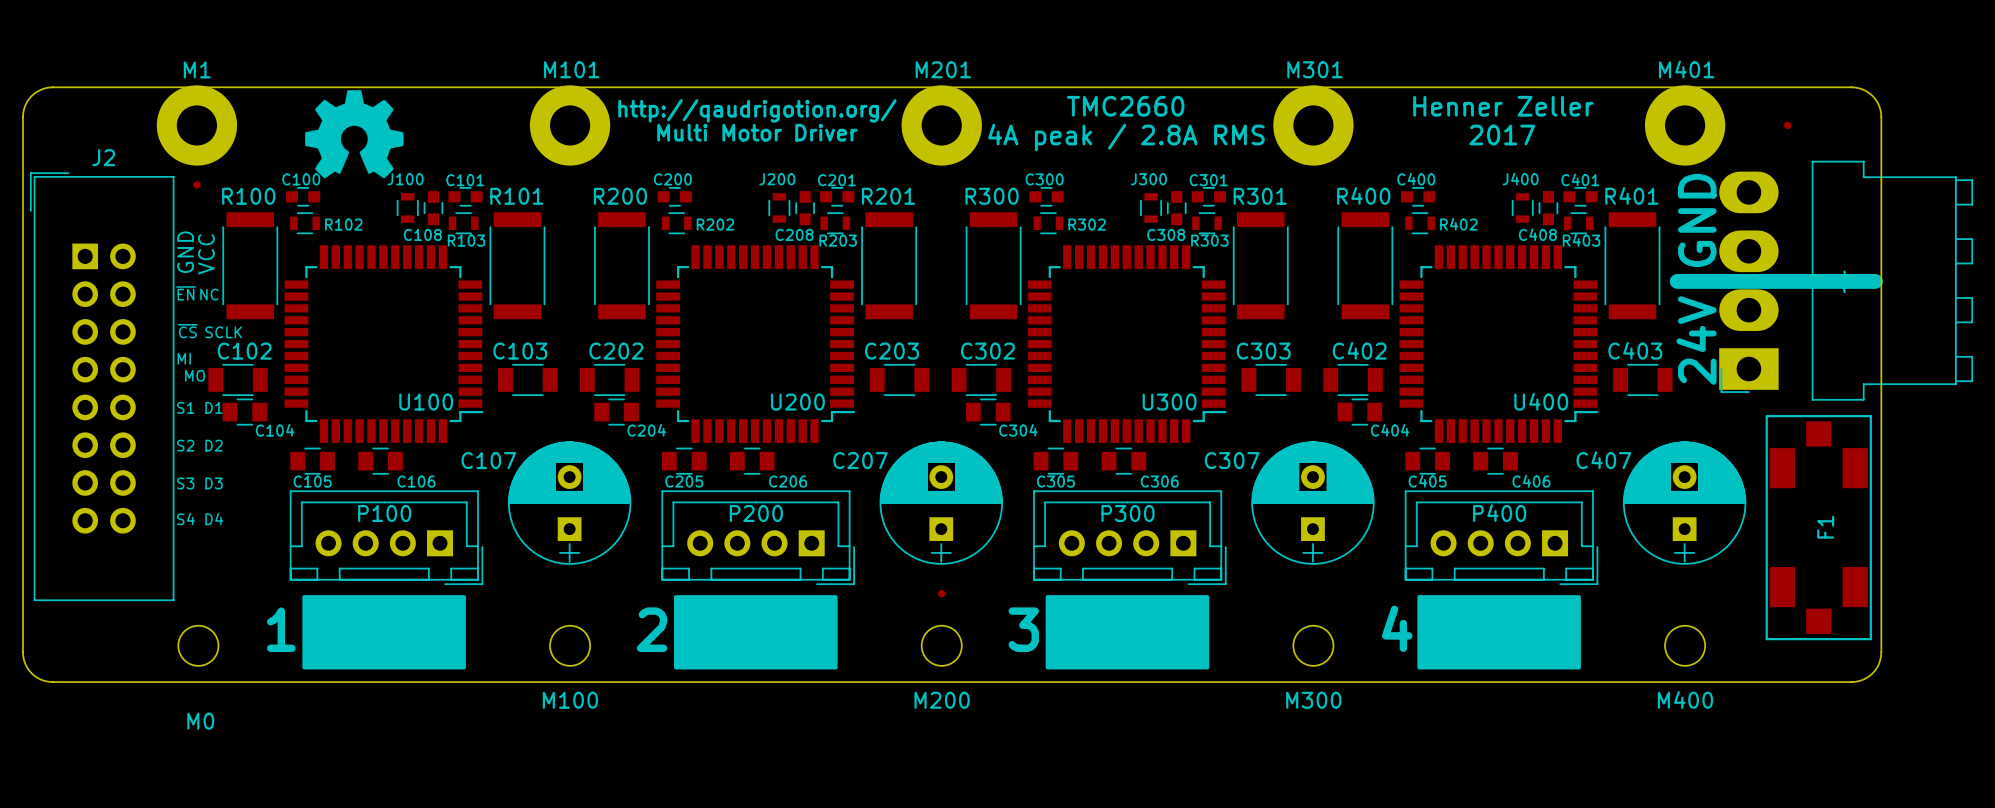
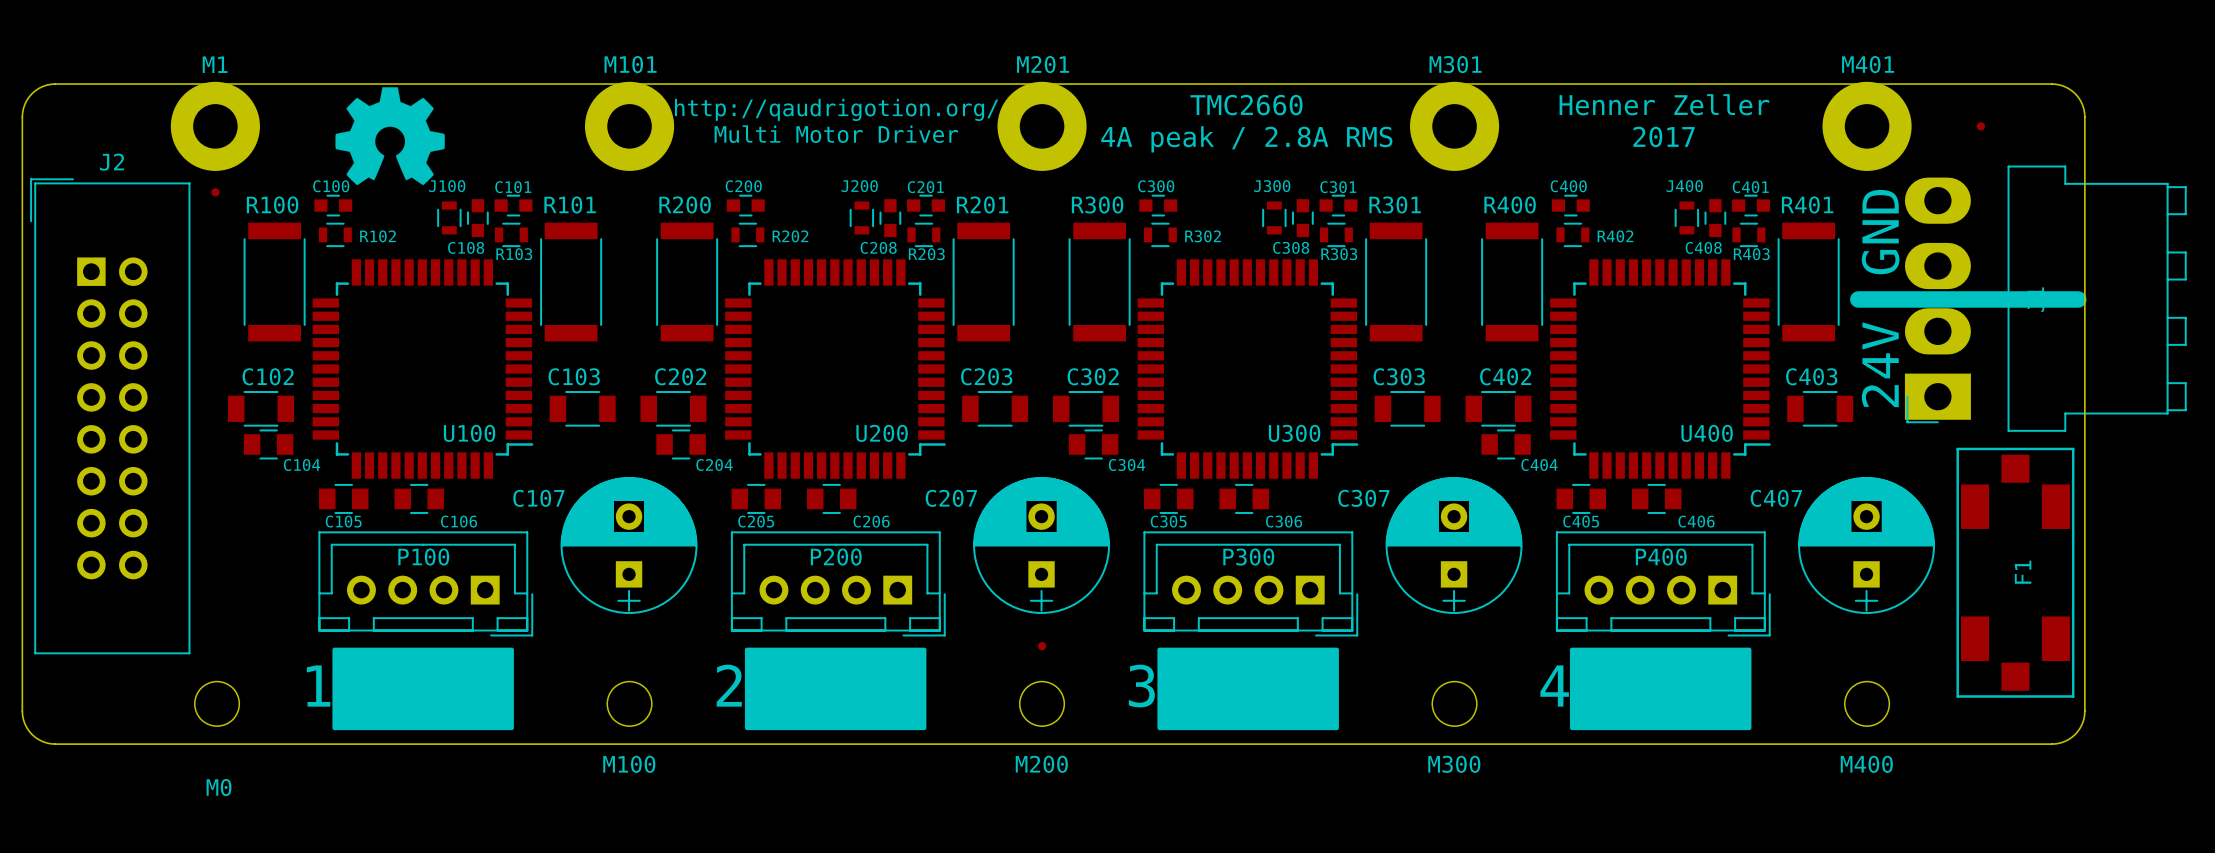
text: GND (185, 252) -> none
text: VCC (206, 254) -> none
text: ~{EN} (185, 293) -> none
text: NC (209, 294) -> none
text: ~{CS} (187, 331) -> none
text: SCLK (223, 332) -> none
text: MI (184, 358) -> none
text: MO (195, 375) -> none
text: S1 D1 (199, 407) -> none
text: S2 D2 (199, 445) -> none
text: S3 D3 (199, 483) -> none
text: S4 D4 (200, 519) -> none

